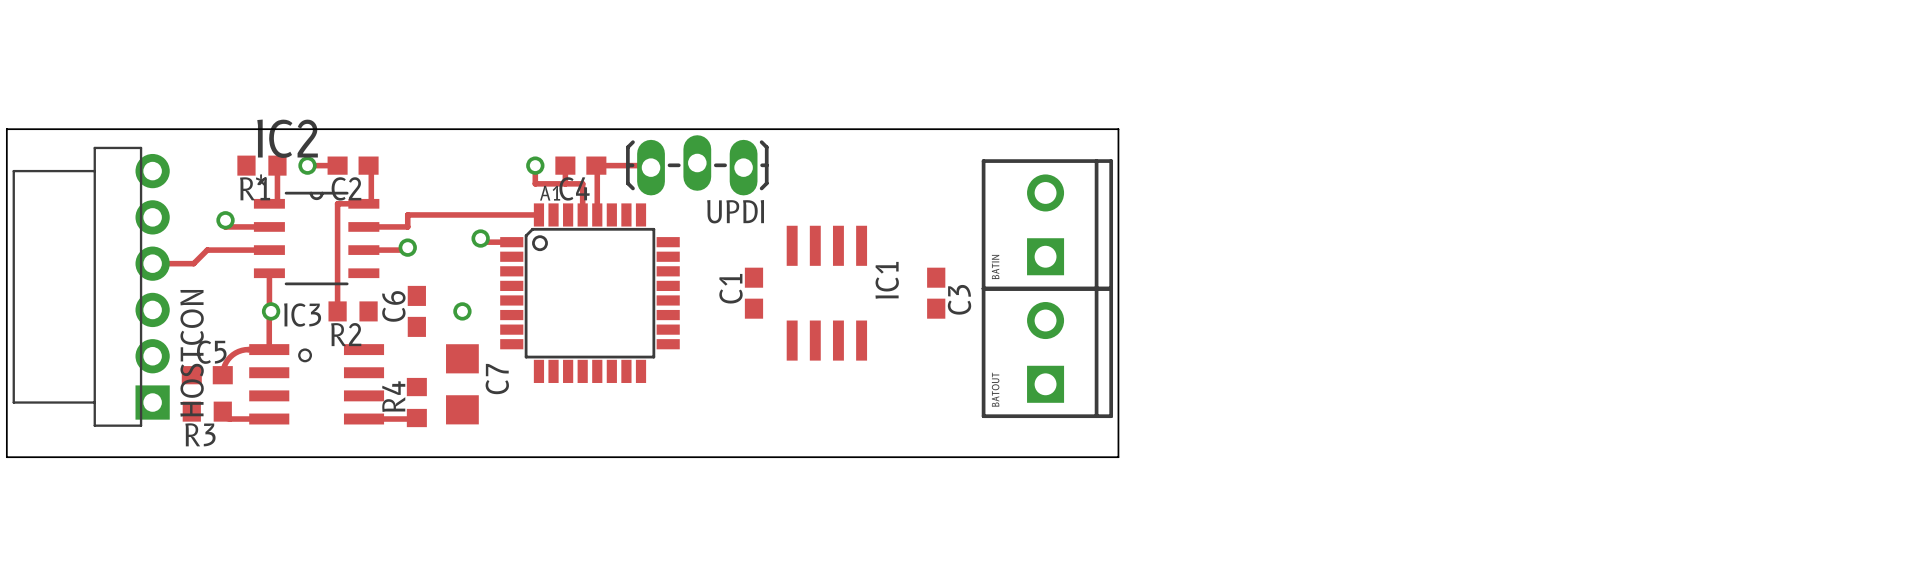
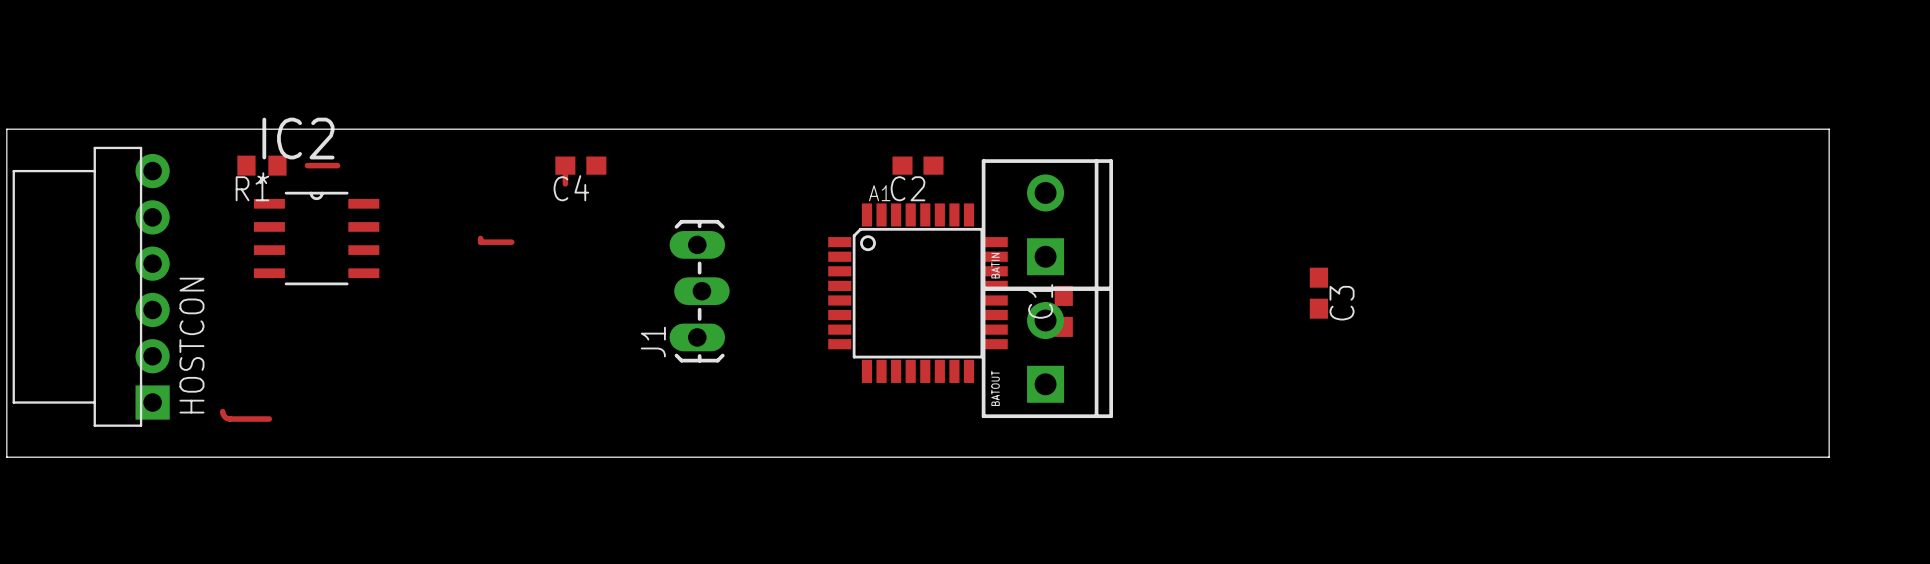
board edge: (1118, 129) (1118, 457) -> (1118, 129) (1829, 129) (1829, 457) (1118, 457)
track: (277, 165) (277, 203) (269, 203) -> none
via: (307, 165) -> none
C2 position: (353, 165) -> (917, 165)
track: (368, 165) (371, 165) (371, 202) (337, 203) (337, 311) -> none
track: (535, 165) (535, 183) (582, 183) (582, 214) -> none
via: (535, 165) -> none
track: (596, 165) (651, 165) (651, 167) -> none
track: (597, 165) (597, 214) -> none
UPDI: (697, 165) -> none
track: (538, 214) (407, 214) (407, 226) (363, 226) -> none
track: (225, 220) (225, 226) (269, 226) -> none
via: (225, 220) -> none
via: (480, 238) -> none
track: (407, 247) (407, 250) (363, 250) -> none
via: (407, 247) -> none
track: (269, 250) (207, 250) (193, 263) (152, 263) -> none
track: (269, 273) (269, 311) -> none
J1: none -> (699, 291)
A1 position: (589, 293) -> (917, 293)
C1 position: (753, 293) -> (1063, 311)
IC1: (826, 293) -> none
C3 position: (936, 293) -> (1318, 293)
track: (271, 311) (269, 311) (269, 349) (245, 349) (235, 353) (226, 362) (222, 375) -> none
via: (271, 311) -> none
R2: (353, 311) -> none
C6: (416, 311) -> none
via: (462, 311) -> none
C5: (207, 375) -> none
IC3: (316, 384) -> none
C7: (462, 384) -> none
R4: (416, 402) -> none
R3: (207, 411) -> none
track: (416, 418) (364, 419) -> none

